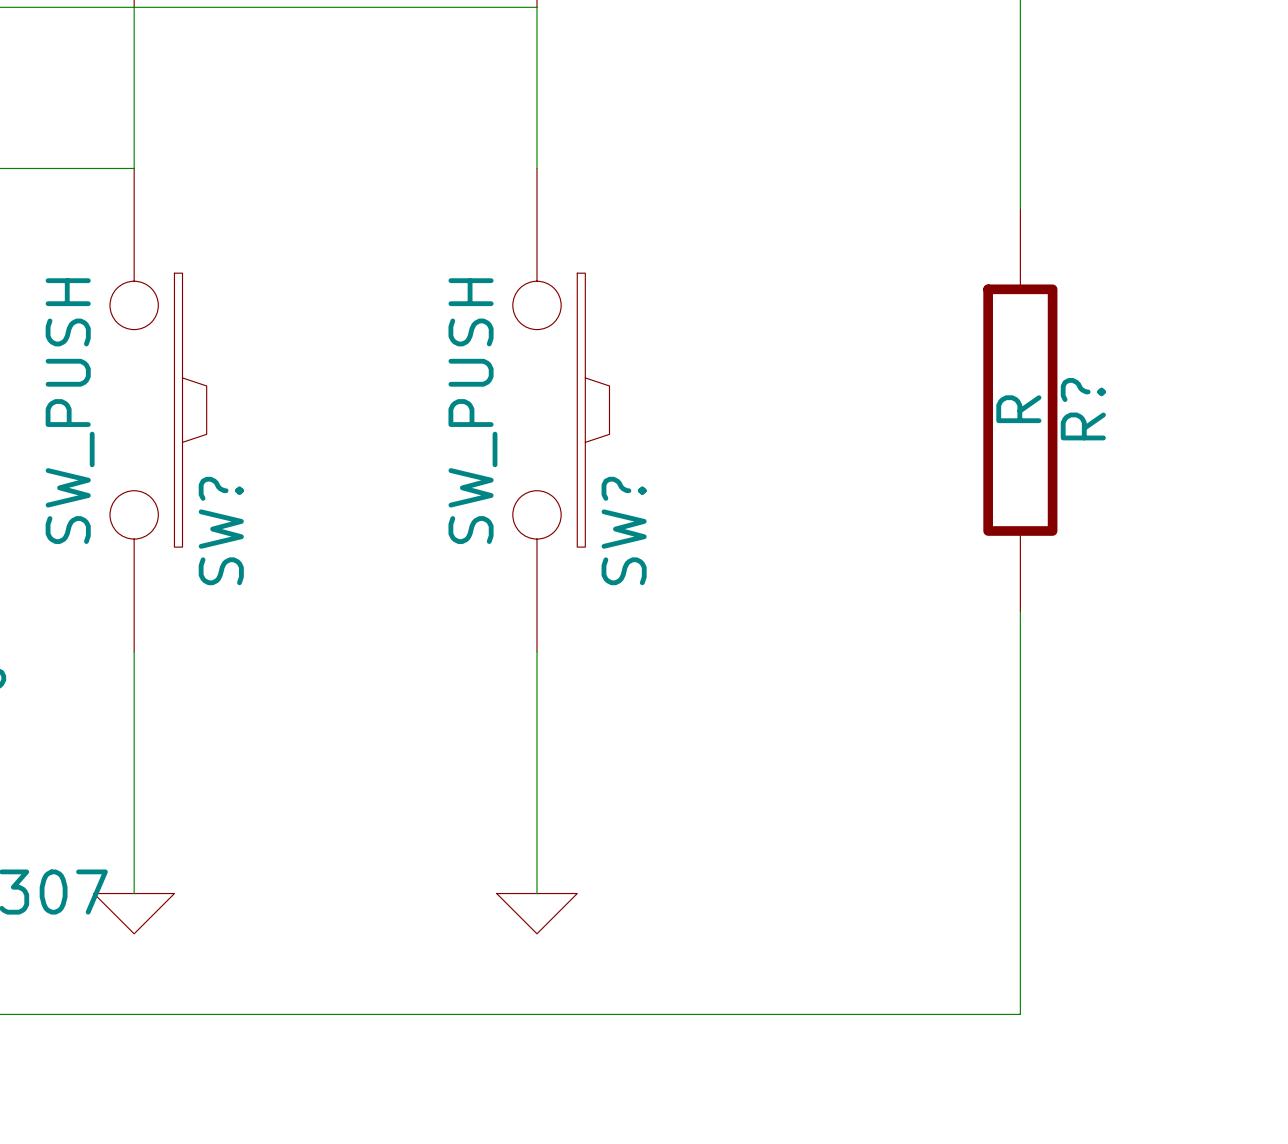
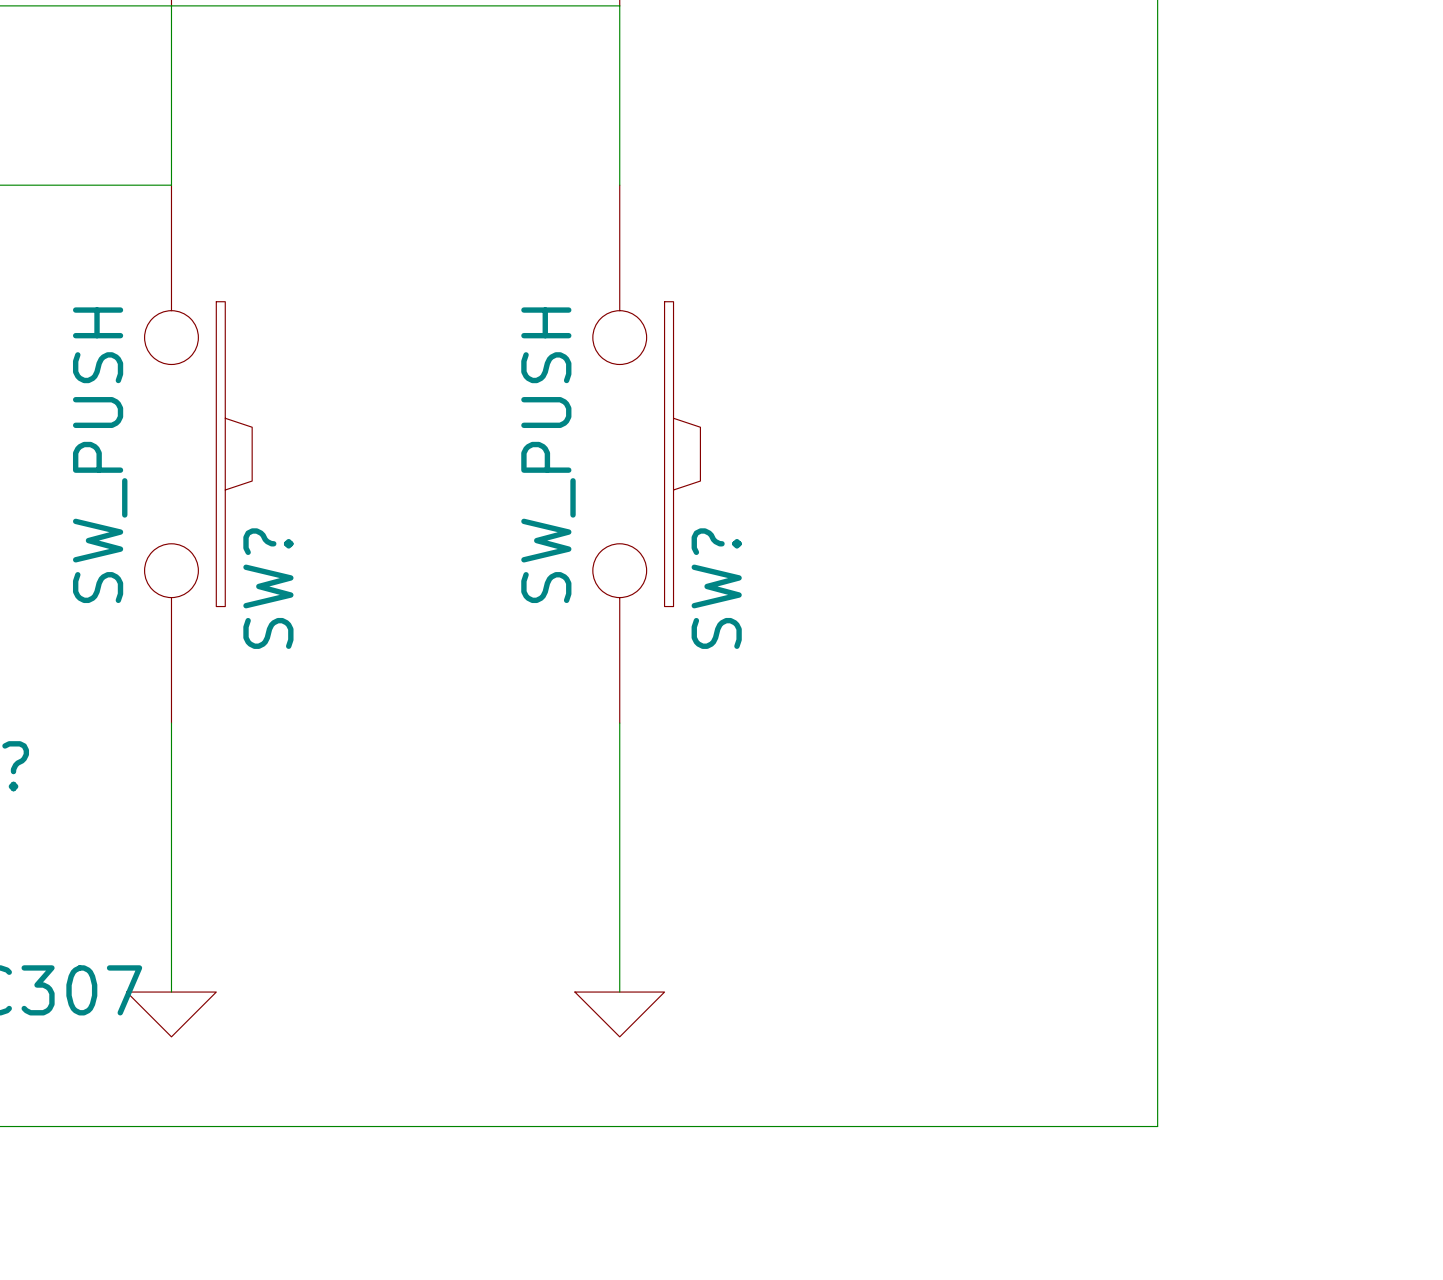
wire: none -> (1157, 230) (1157, 678)
R?: R (1020, 410) -> none

